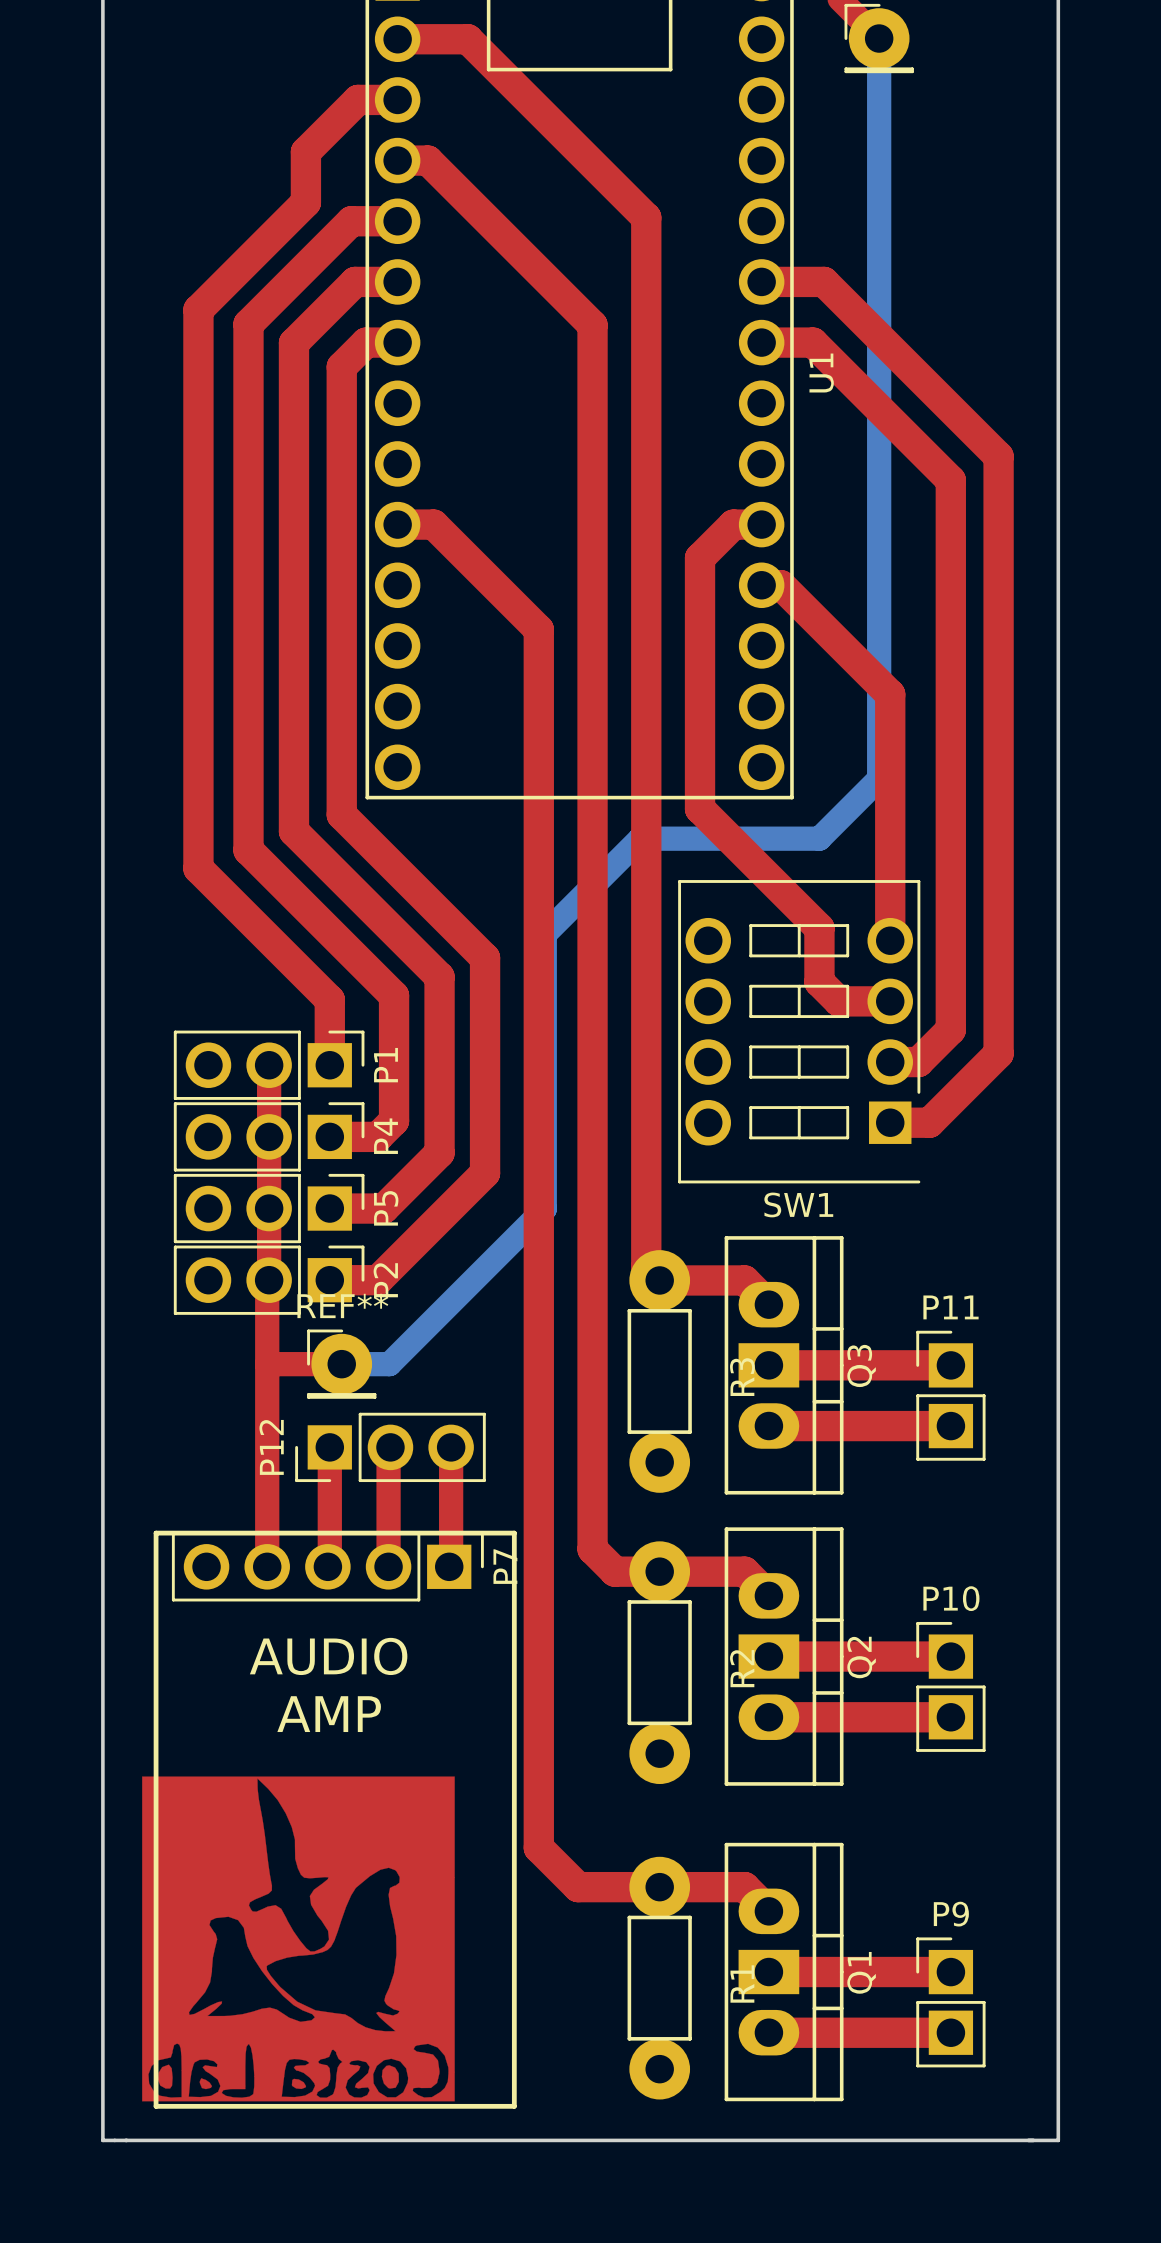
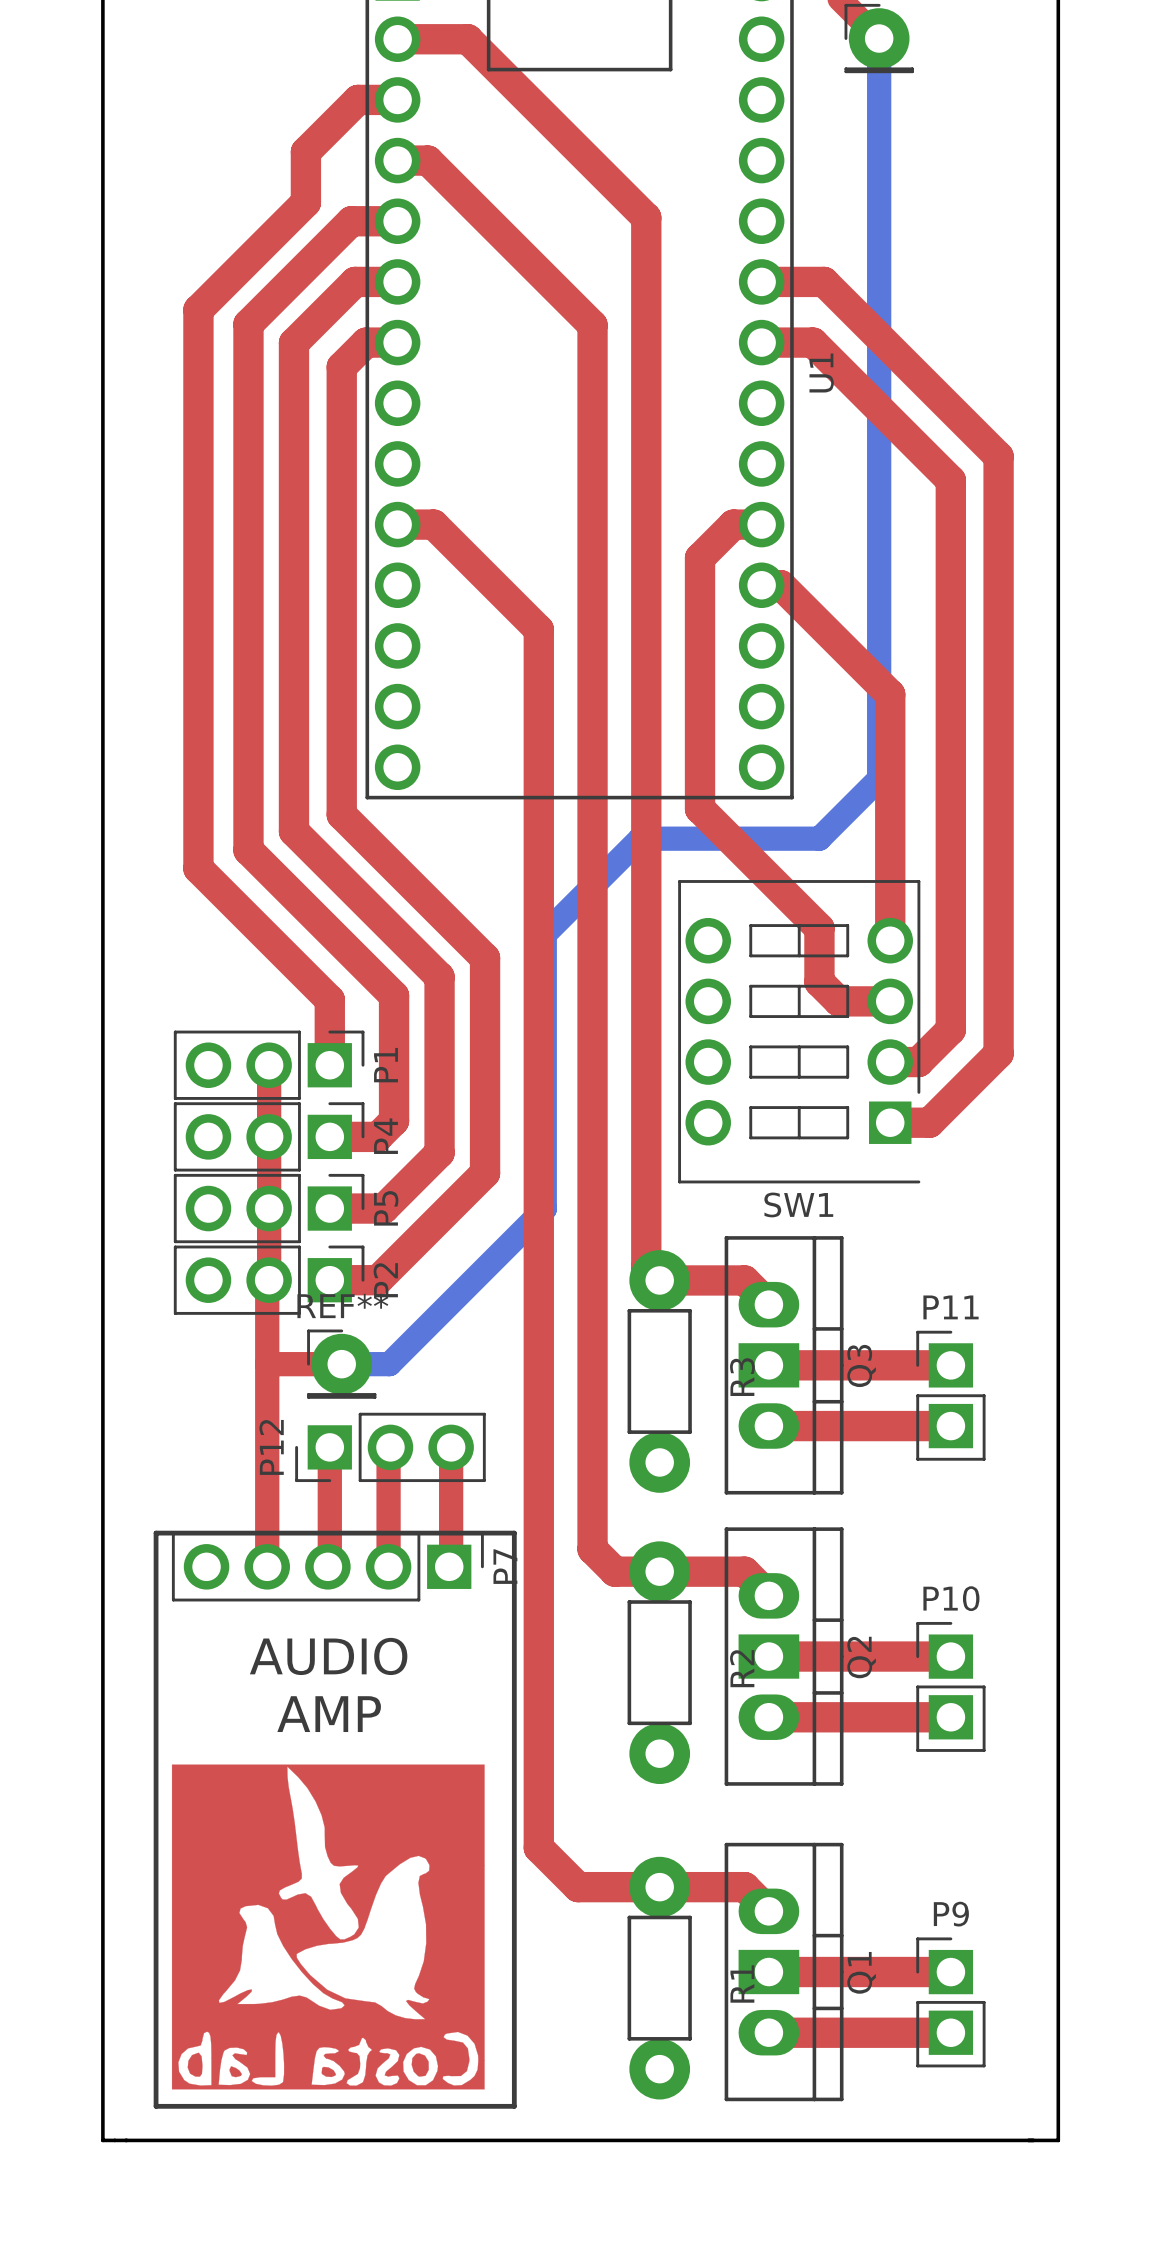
drawing position: (298, 1938) -> (328, 1926)

